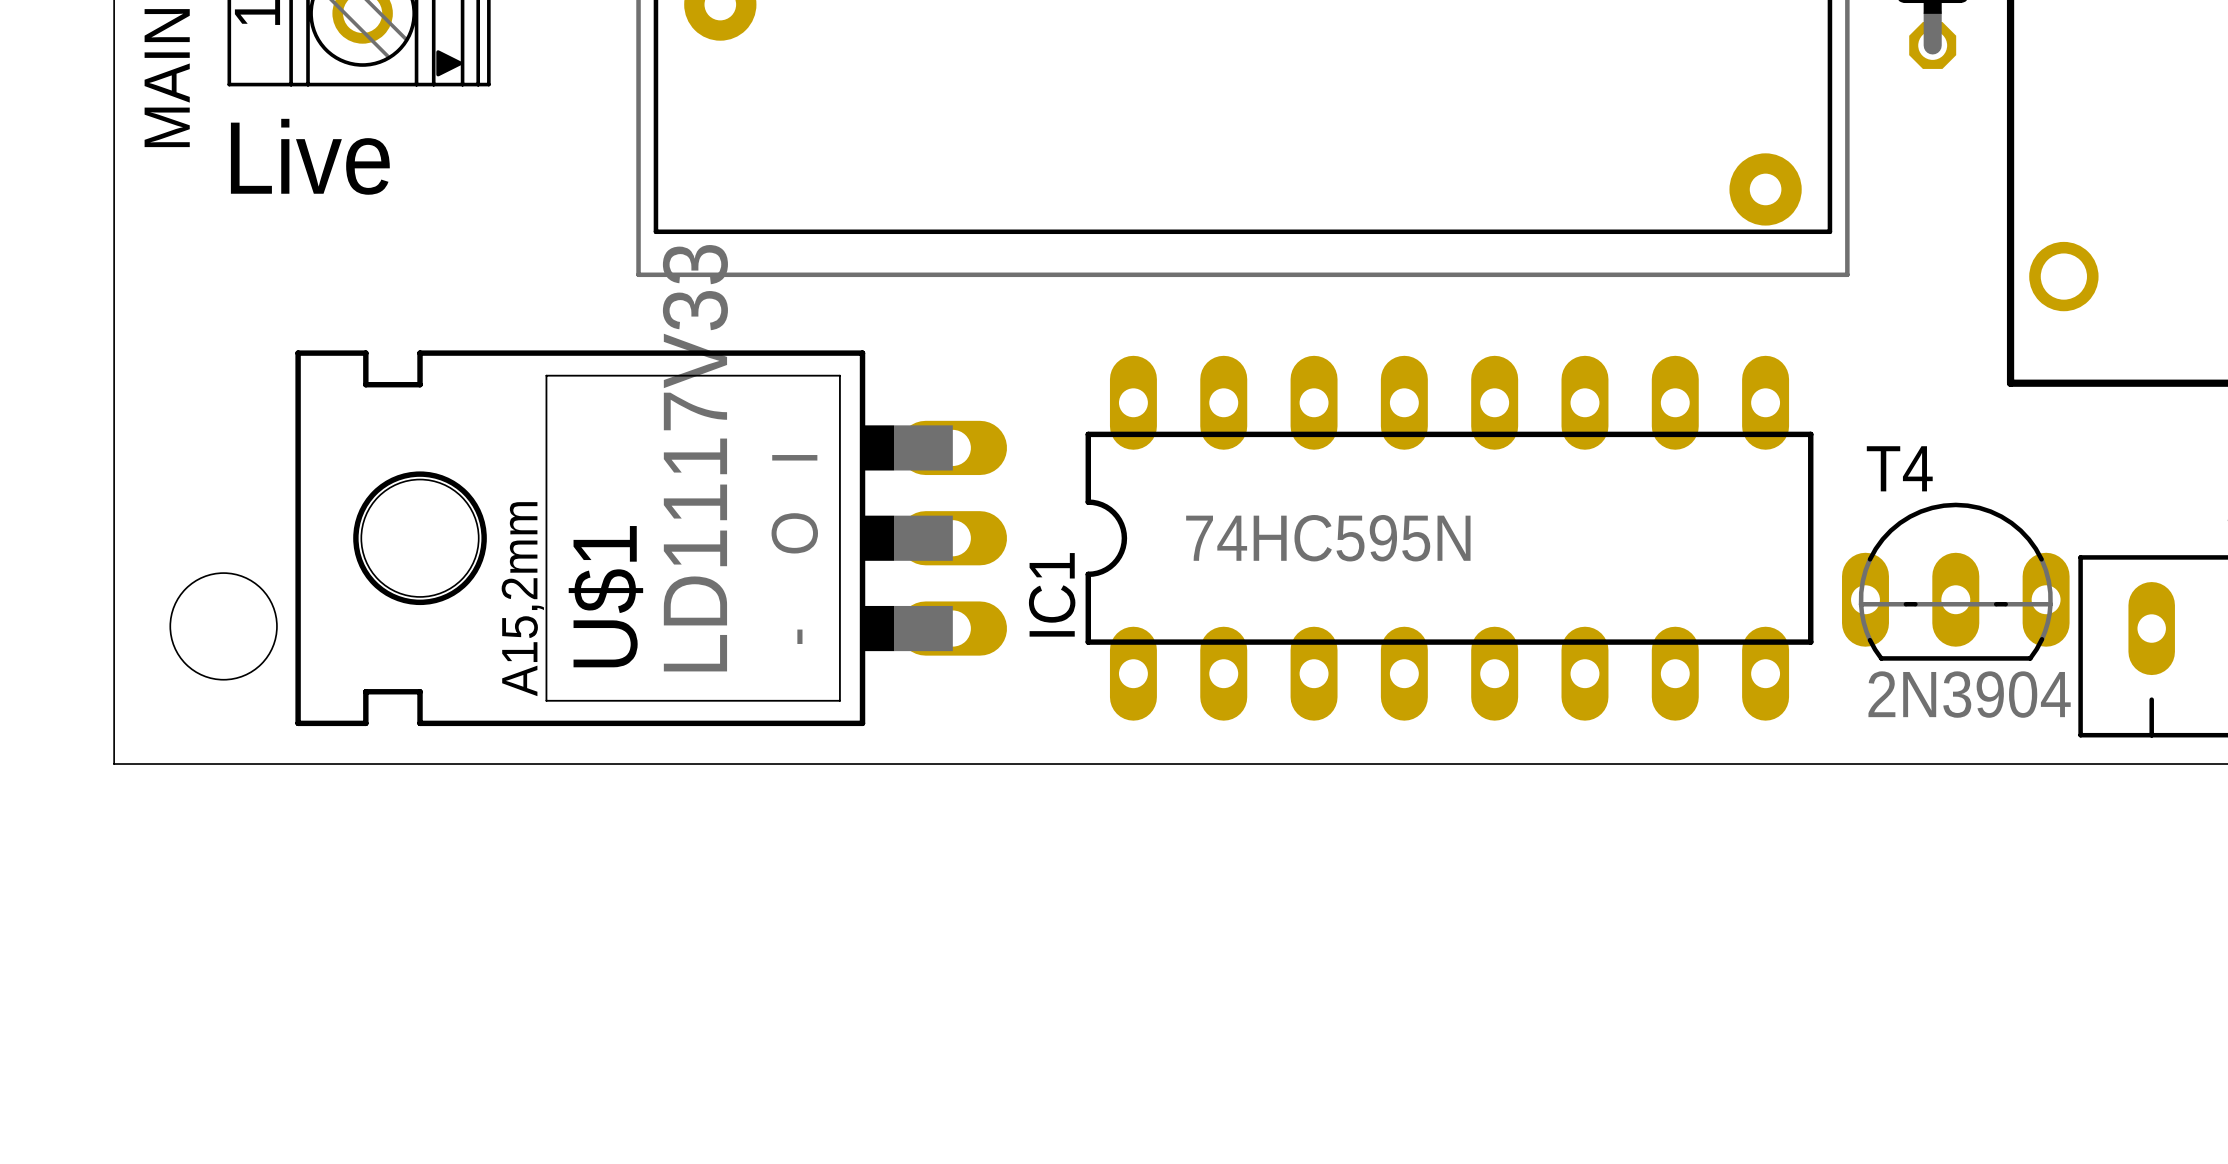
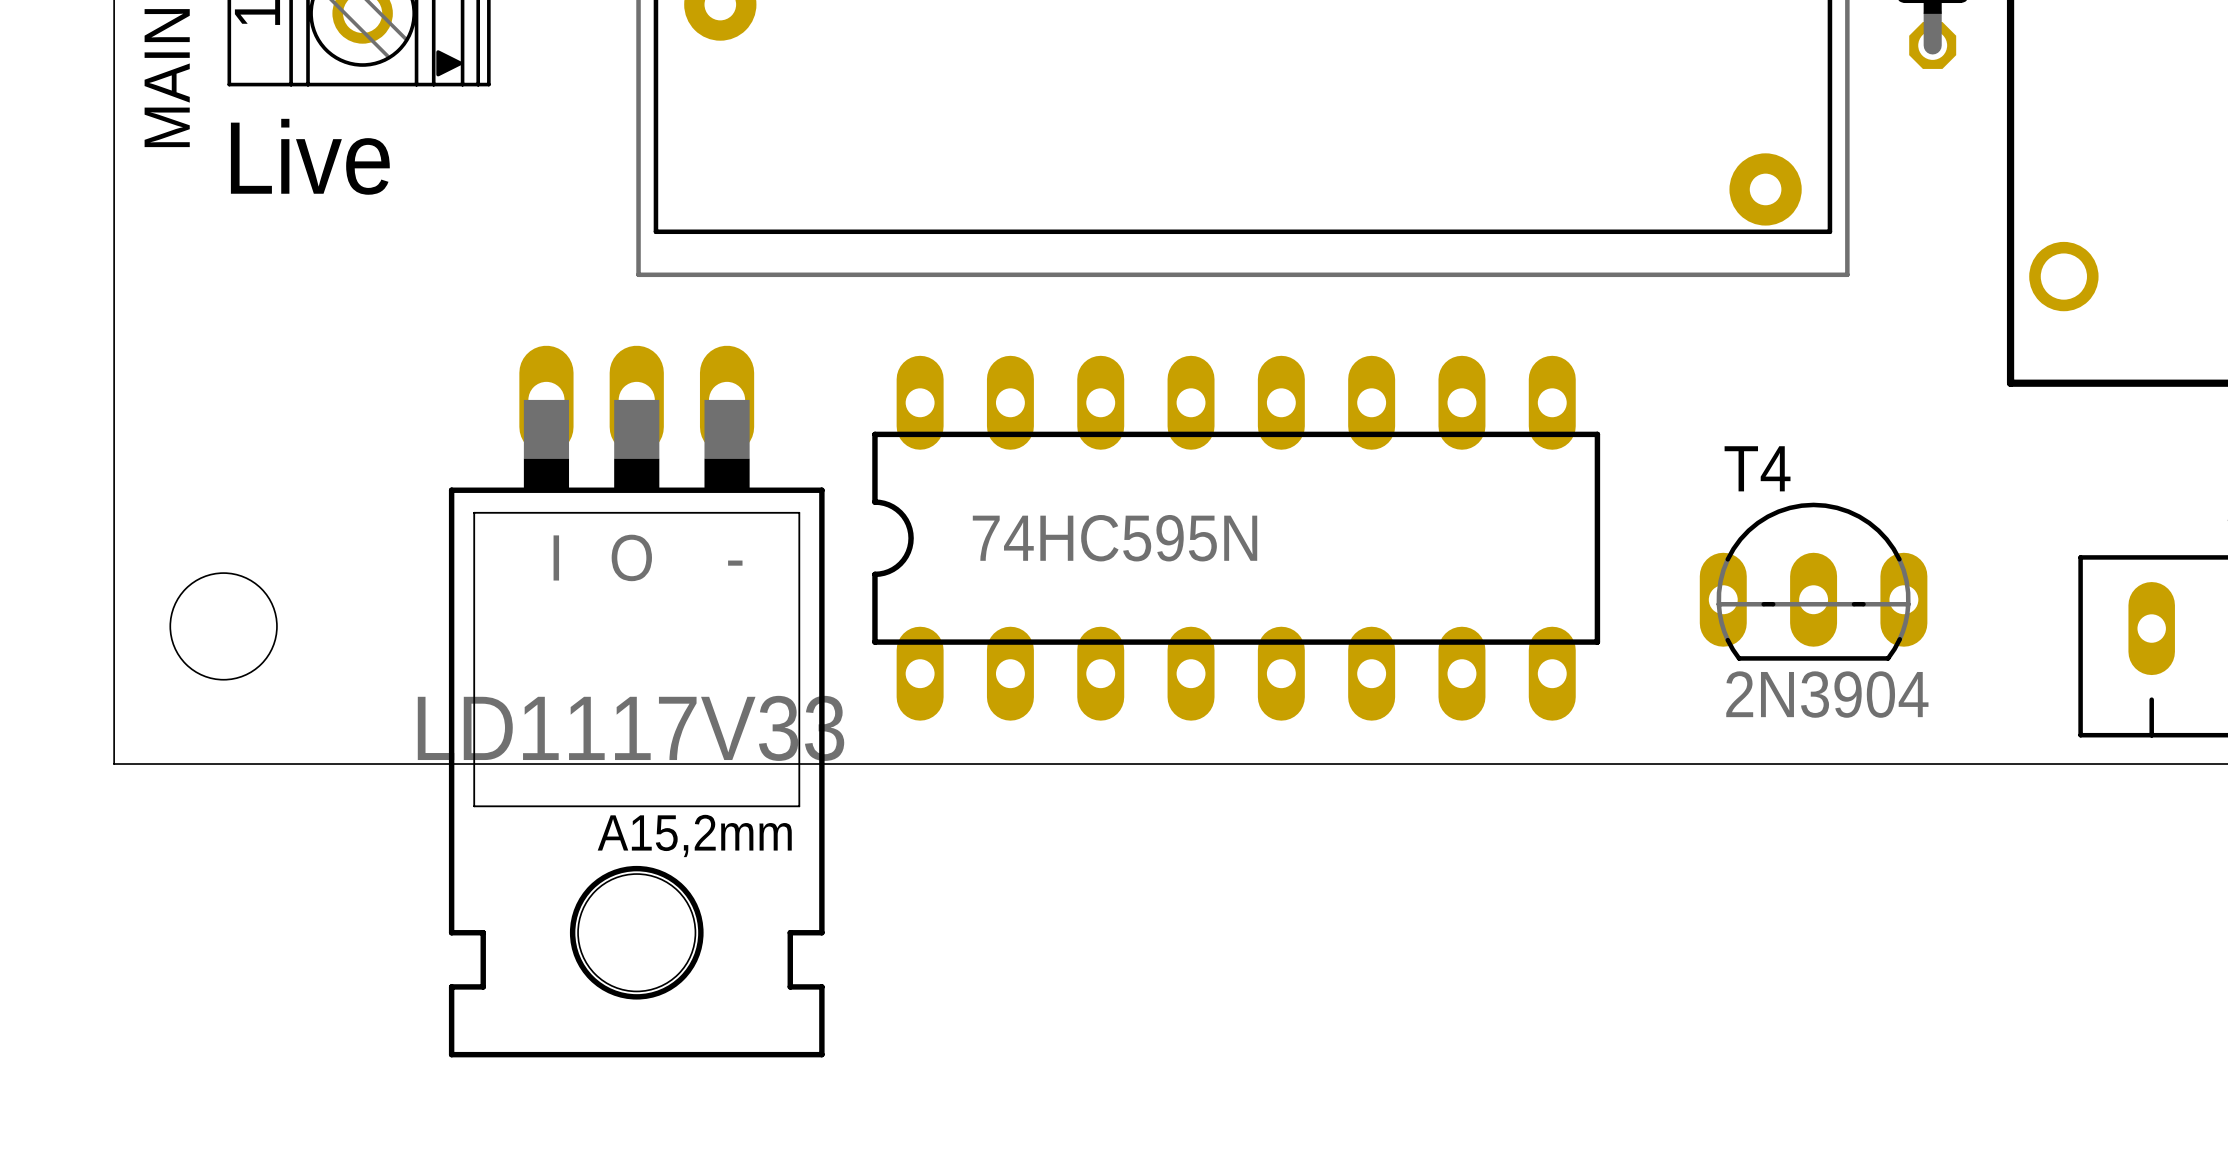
U$1: LD1117V33 (651, 538) -> none
part: none -> 74HC595N (1236, 538)
IC1: 74HC595N (1449, 538) -> none
T4 position: (1955, 581) -> (1813, 581)
part: none -> LD1117V33 (636, 701)

